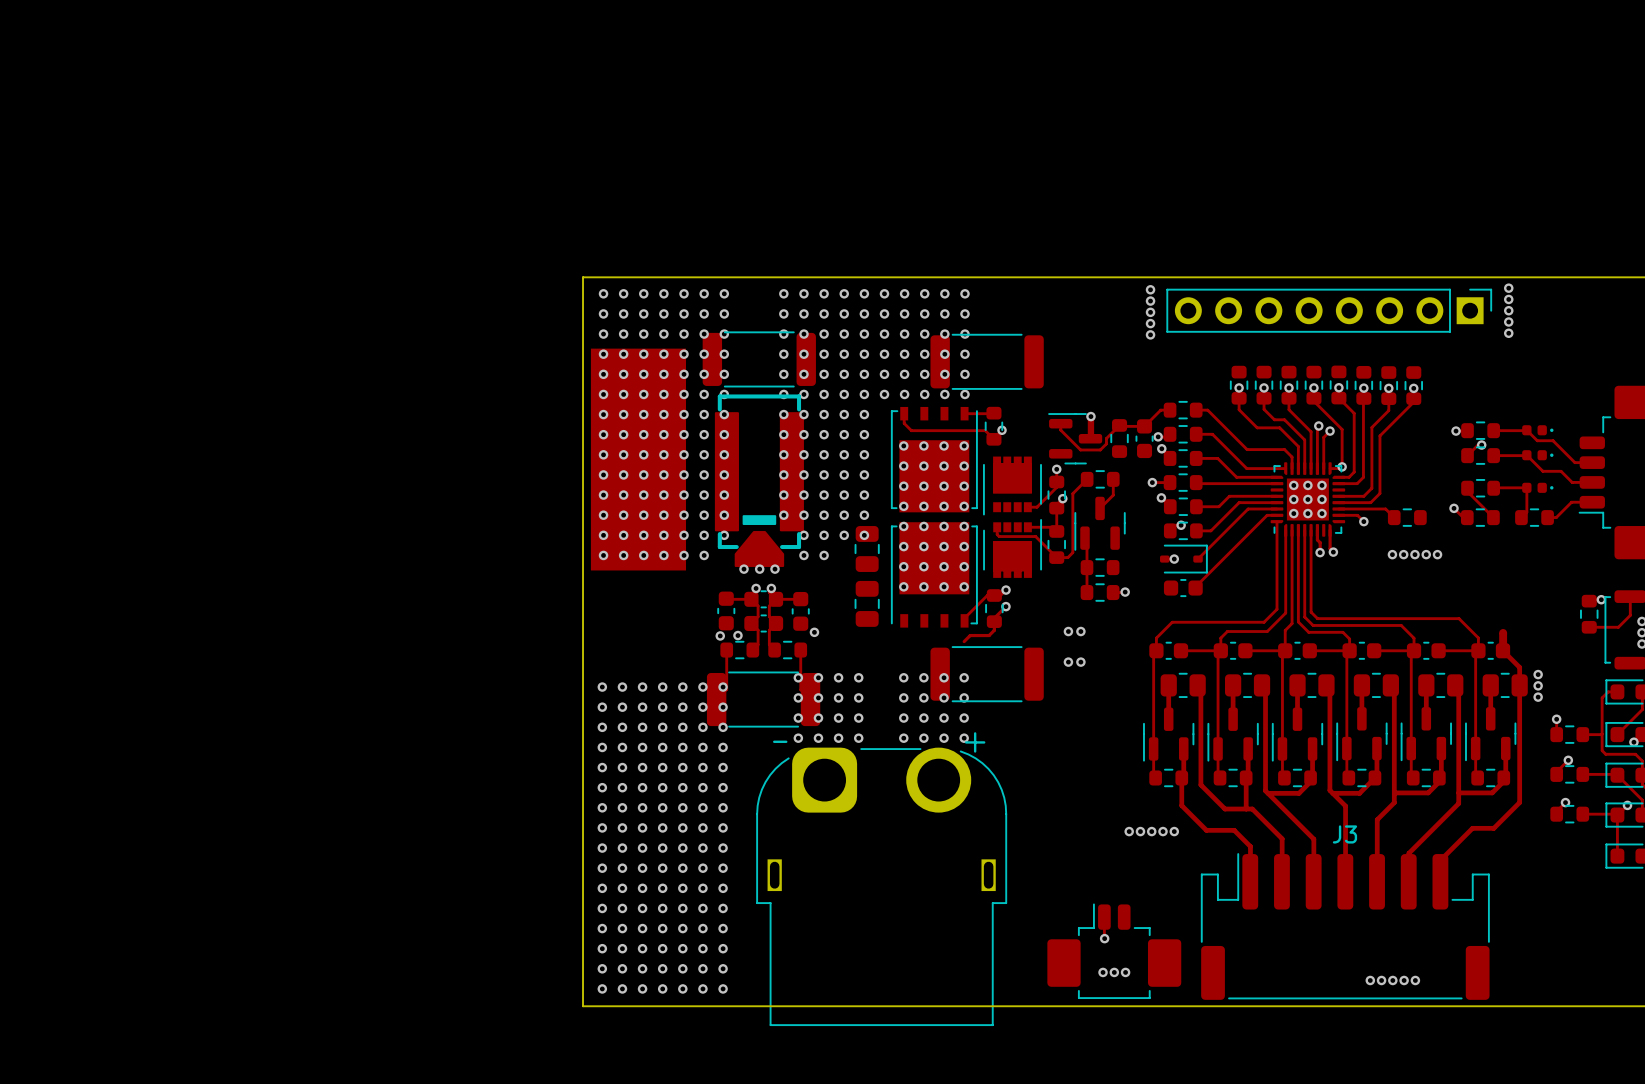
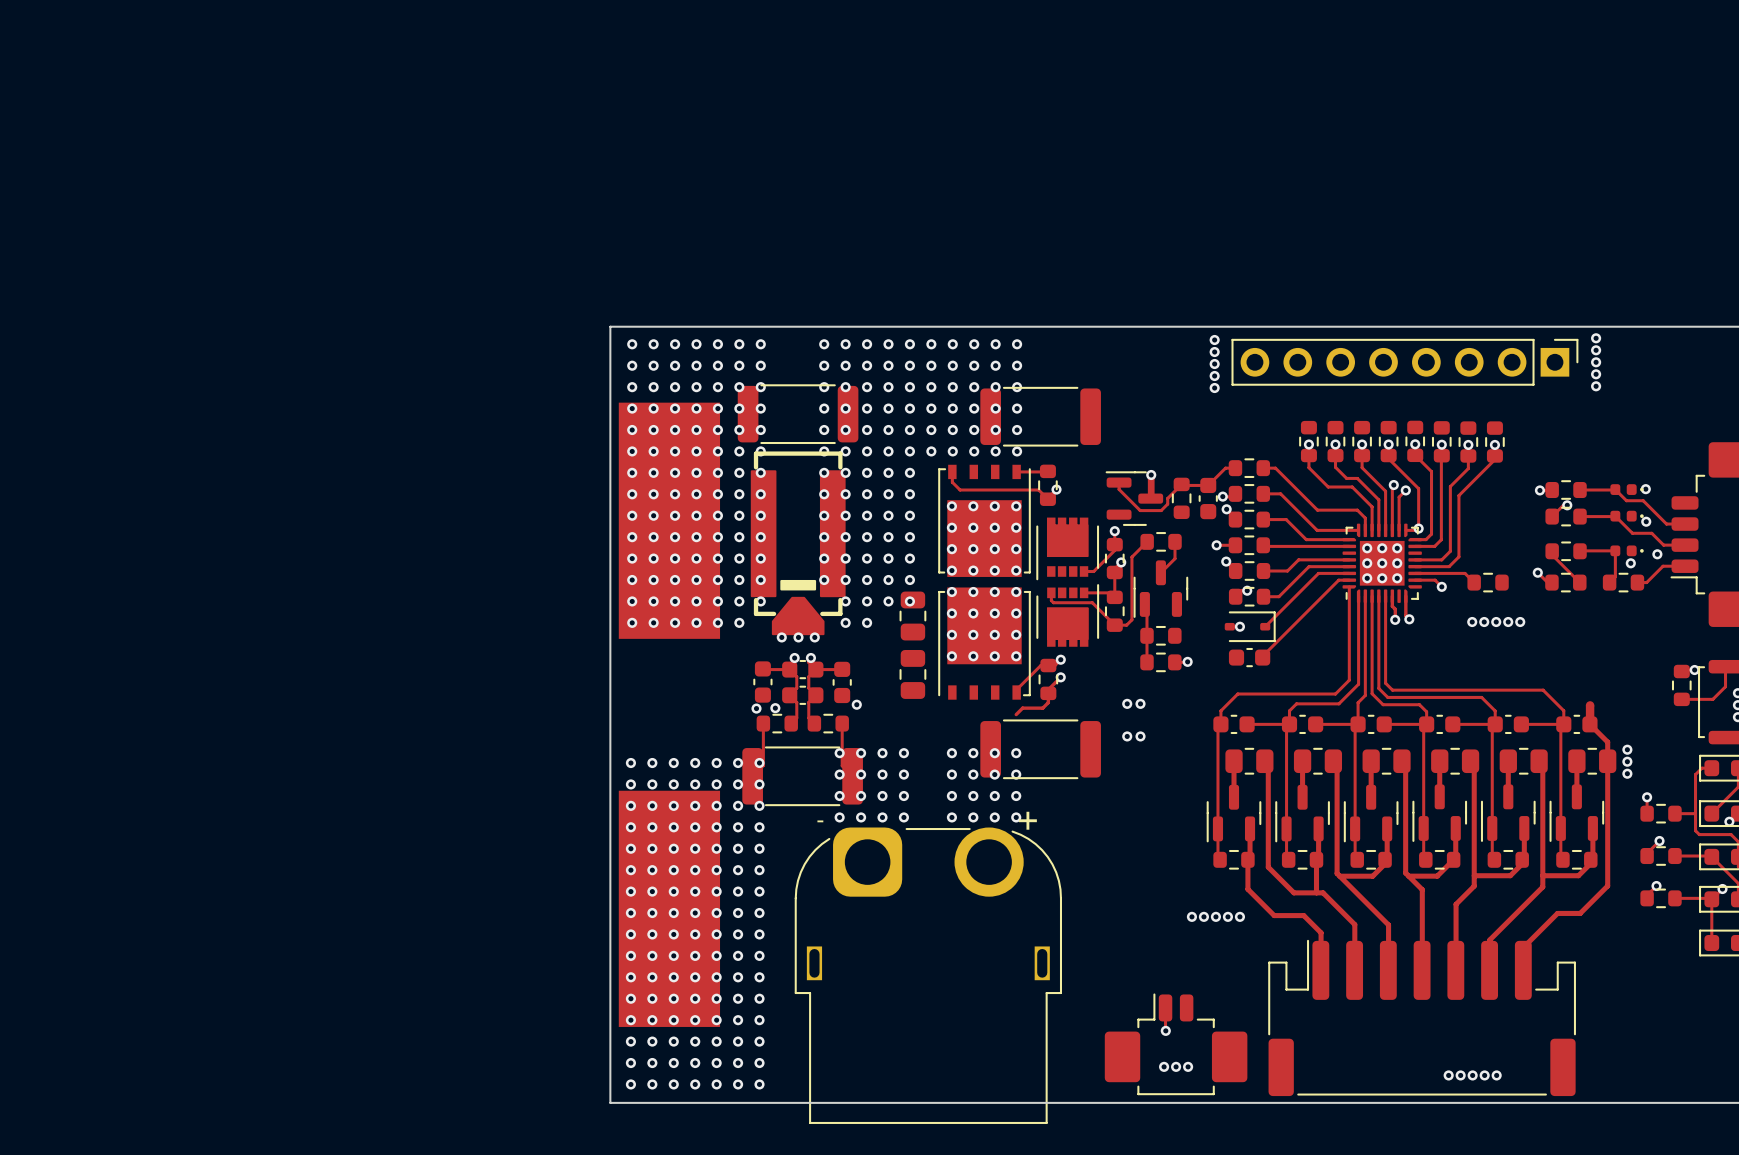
via: none -> (1645, 489)
via: none -> (1646, 521)
via: none -> (1657, 554)
via: none -> (1630, 563)
part: none -> (669, 908)
J3 name: J3 (1344, 834) -> none

